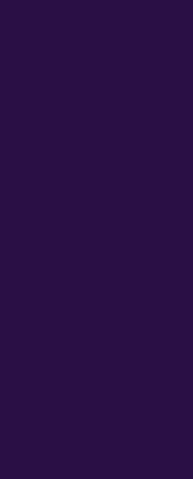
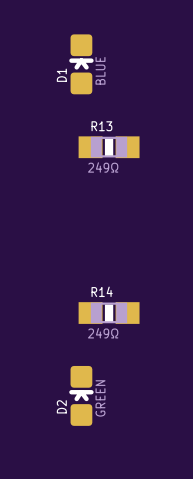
D1: none -> BLUE (81, 64)
R13: none -> 249Ω (109, 147)
R14: none -> 249Ω (109, 313)
D2: none -> GREEN (81, 395)

